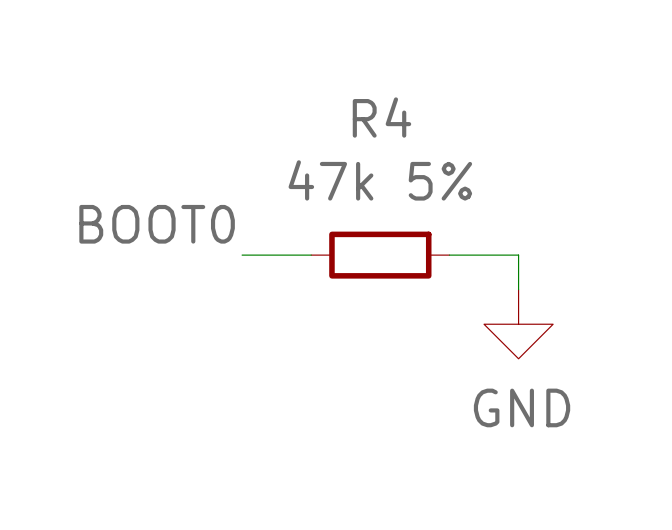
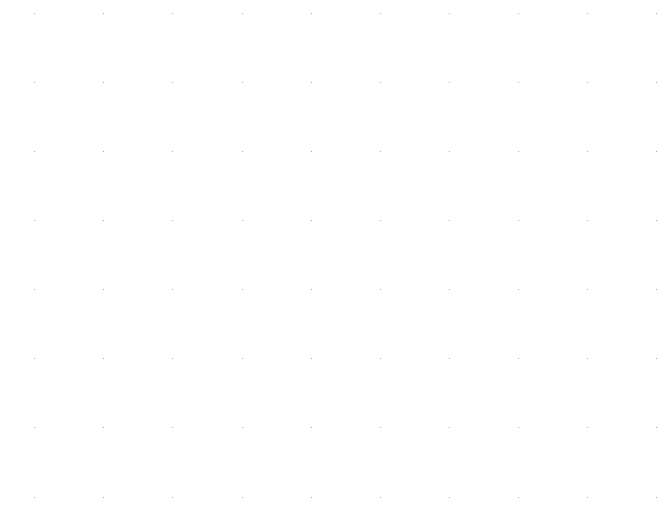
label: BOOT0 (157, 224) -> none
wire: (242, 255) (311, 255) -> none
R4: 47k 5% (380, 255) -> none
wire: (449, 255) (518, 255) (518, 289) -> none
power symbol: GND (518, 324) -> none

